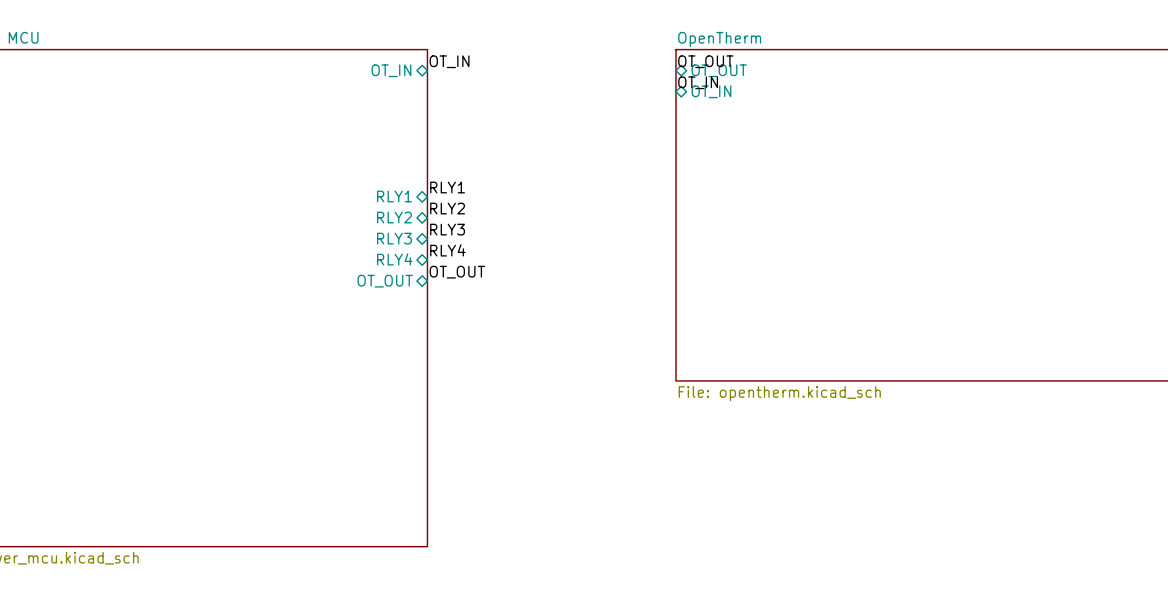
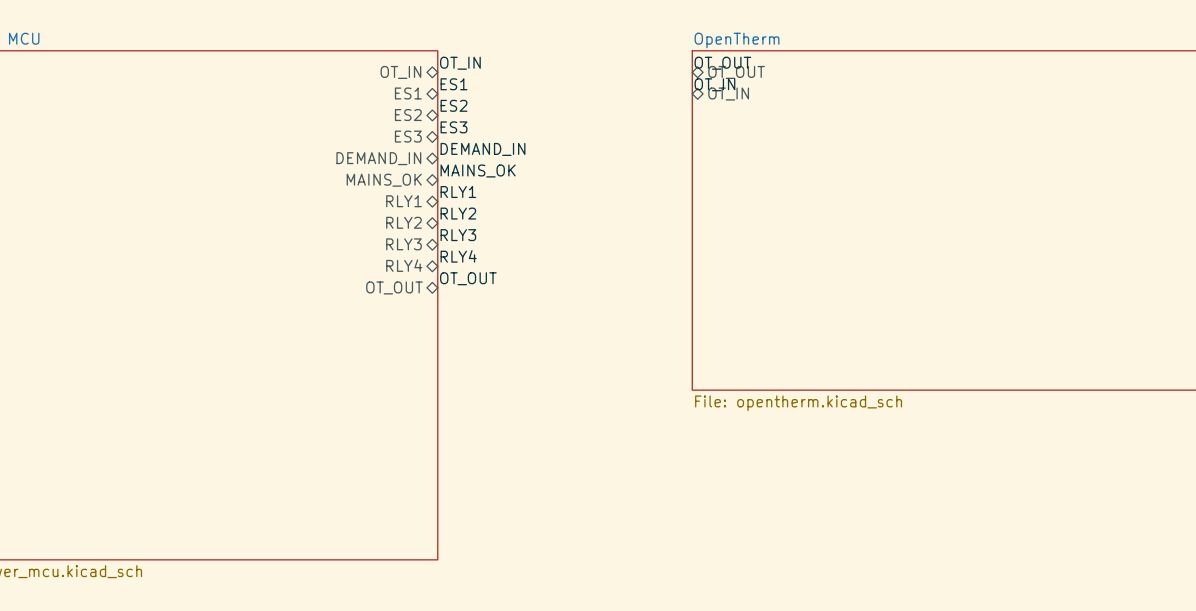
label: none -> ES1 (454, 84)
sheet pin: none -> ES1 (408, 93)
label: none -> ES2 (454, 105)
sheet pin: none -> ES2 (408, 115)
label: none -> ES3 (454, 127)
sheet pin: none -> ES3 (408, 136)
label: none -> DEMAND_IN (483, 149)
sheet pin: none -> DEMAND_IN (378, 158)
label: none -> MAINS_OK (478, 170)
sheet pin: none -> MAINS_OK (384, 180)

